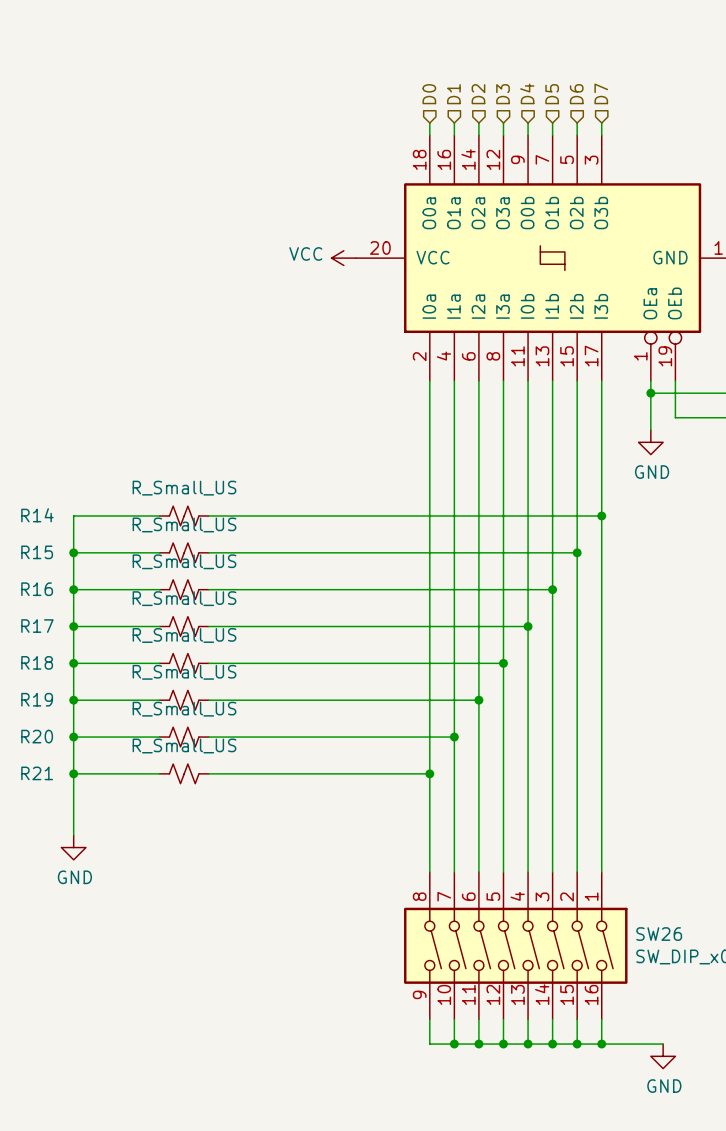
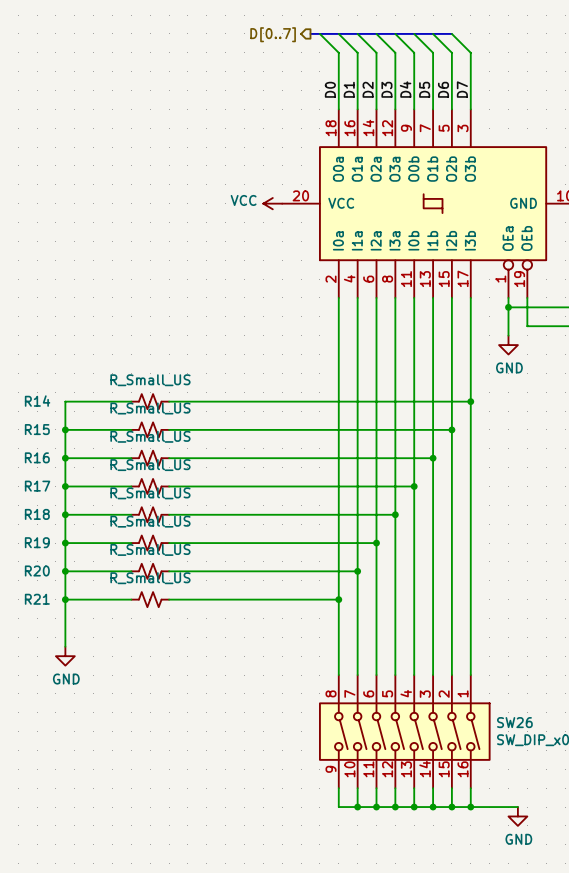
bus: none -> (310, 33) (451, 33)
wire: none -> (319, 33) (338, 52) (338, 99)
wire: none -> (338, 33) (357, 52) (357, 99)
wire: none -> (357, 33) (376, 52) (376, 99)
wire: none -> (376, 33) (395, 52) (395, 99)
wire: none -> (395, 33) (414, 52) (414, 99)
wire: none -> (414, 33) (433, 52) (433, 99)
wire: none -> (433, 33) (451, 52) (451, 99)
wire: none -> (451, 33) (470, 52) (470, 99)
hierarchical label: none -> D[0..7] (273, 34)
hierarchical label: D4 (527, 93) -> none
hierarchical label: D7 (601, 93) -> none
hierarchical label: D0 (429, 94) -> none
hierarchical label: D1 (453, 94) -> none
hierarchical label: D2 (478, 94) -> none
hierarchical label: D3 (503, 94) -> none
hierarchical label: D5 (552, 94) -> none
hierarchical label: D6 (576, 94) -> none
label: none -> D0 (330, 89)
label: none -> D1 (349, 89)
label: none -> D2 (368, 89)
label: none -> D3 (386, 89)
label: none -> D4 (405, 89)
label: none -> D5 (424, 89)
label: none -> D6 (443, 89)
label: none -> D7 (462, 89)

